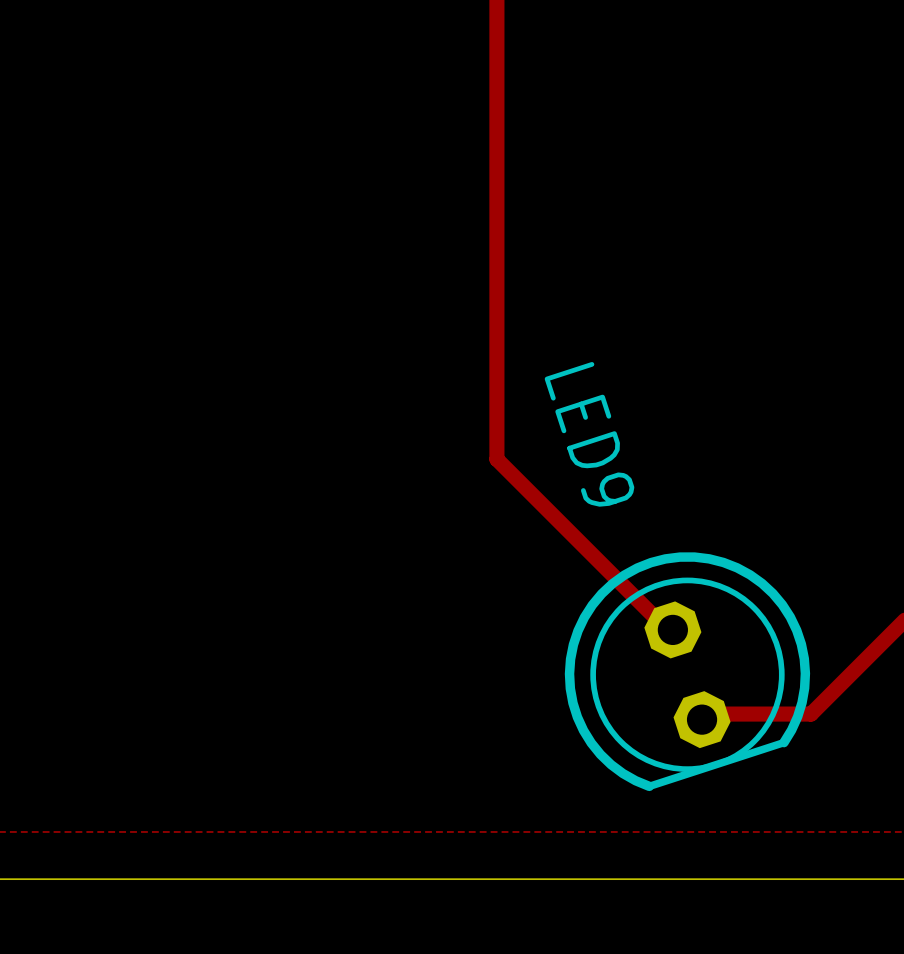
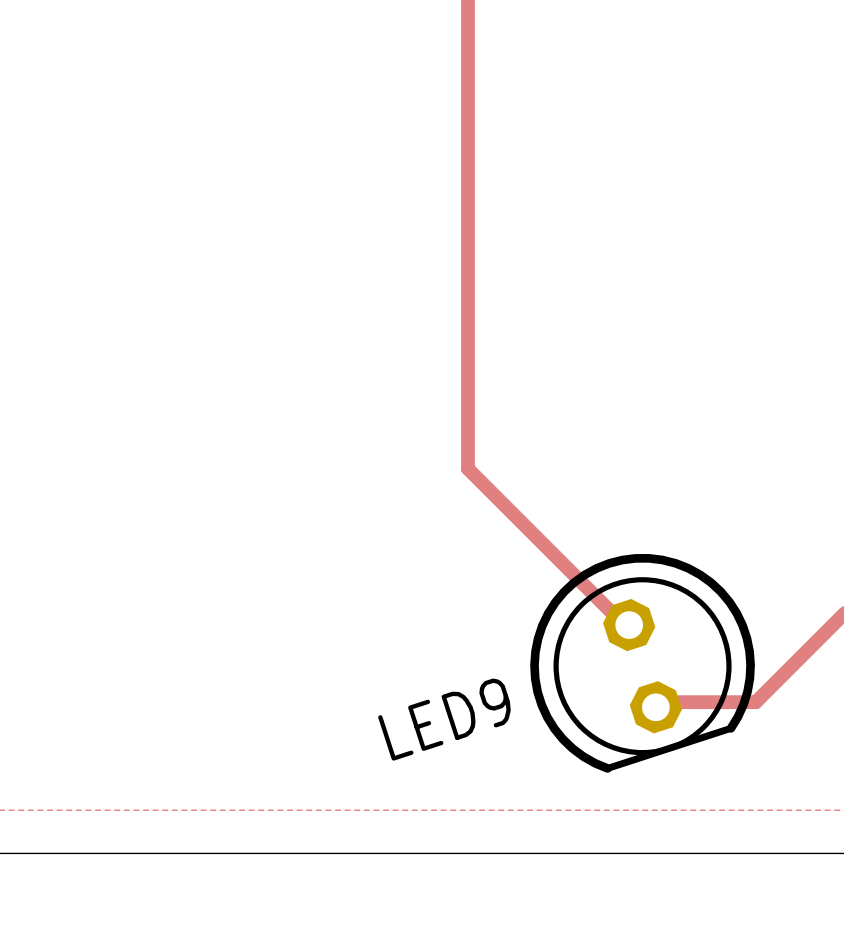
LED9 name rotation: 0° (589, 434) -> 90° counterclockwise (444, 719)
LED9 name position: LED9 (589, 434) -> LED9 (444, 719)

